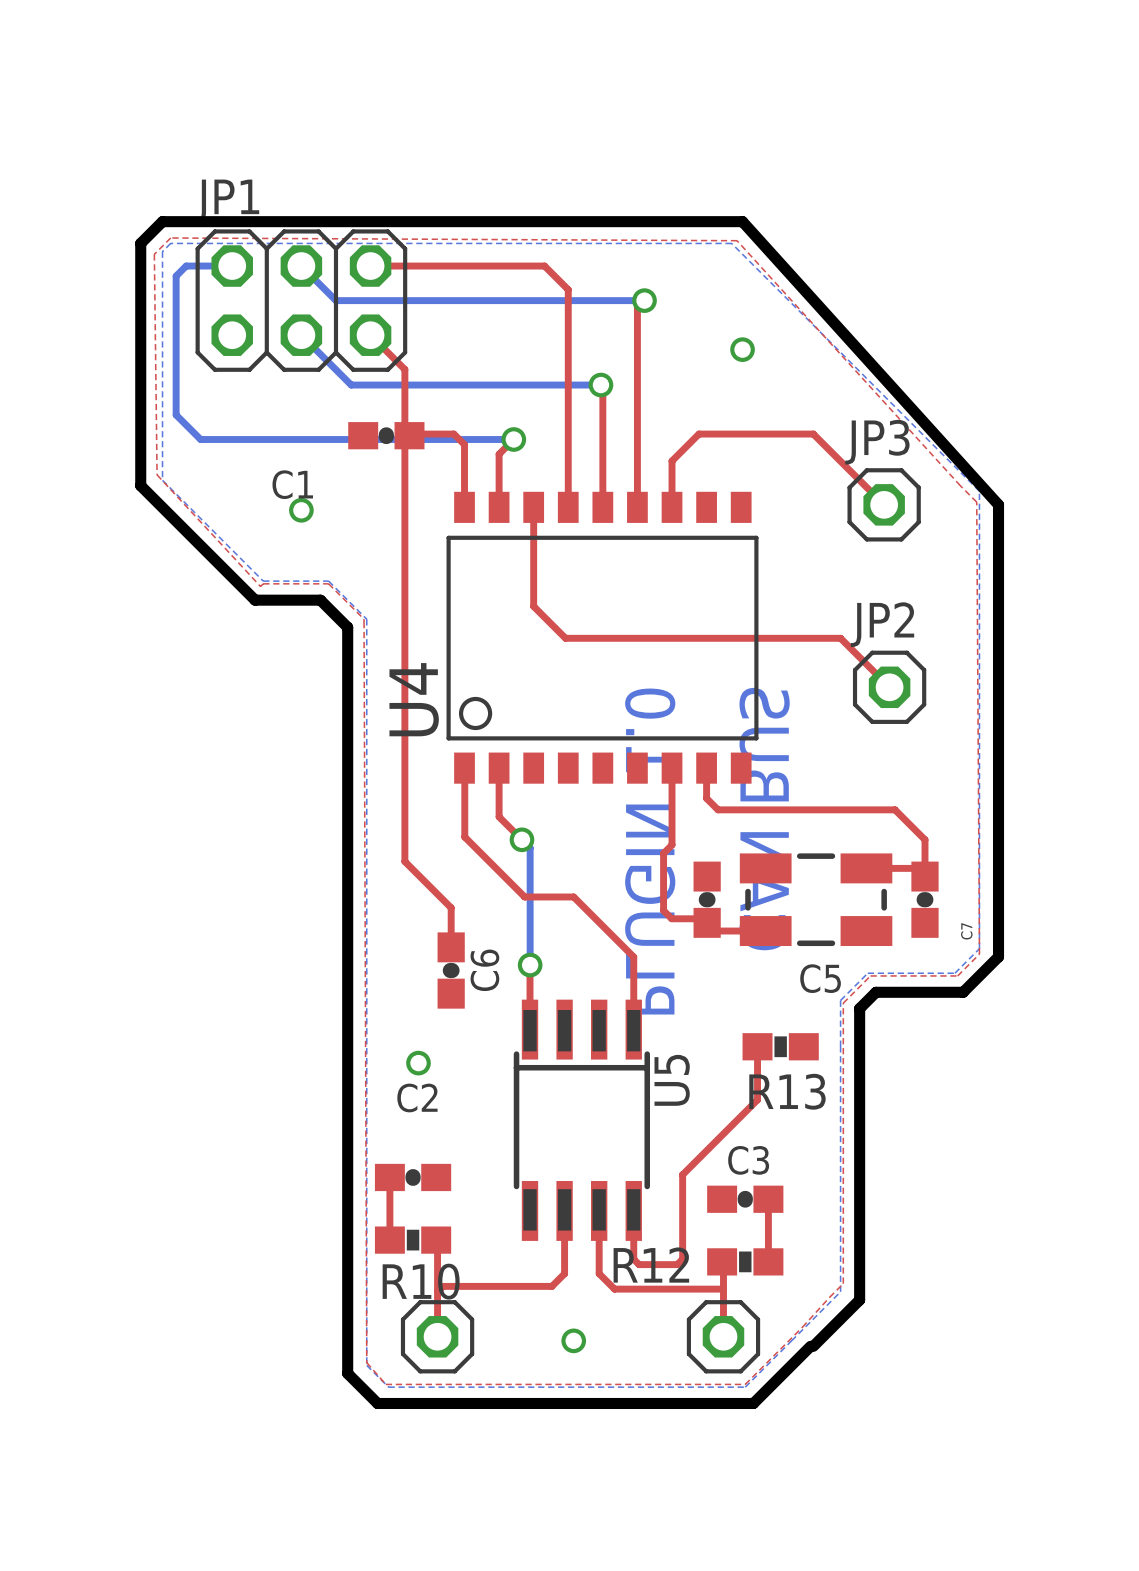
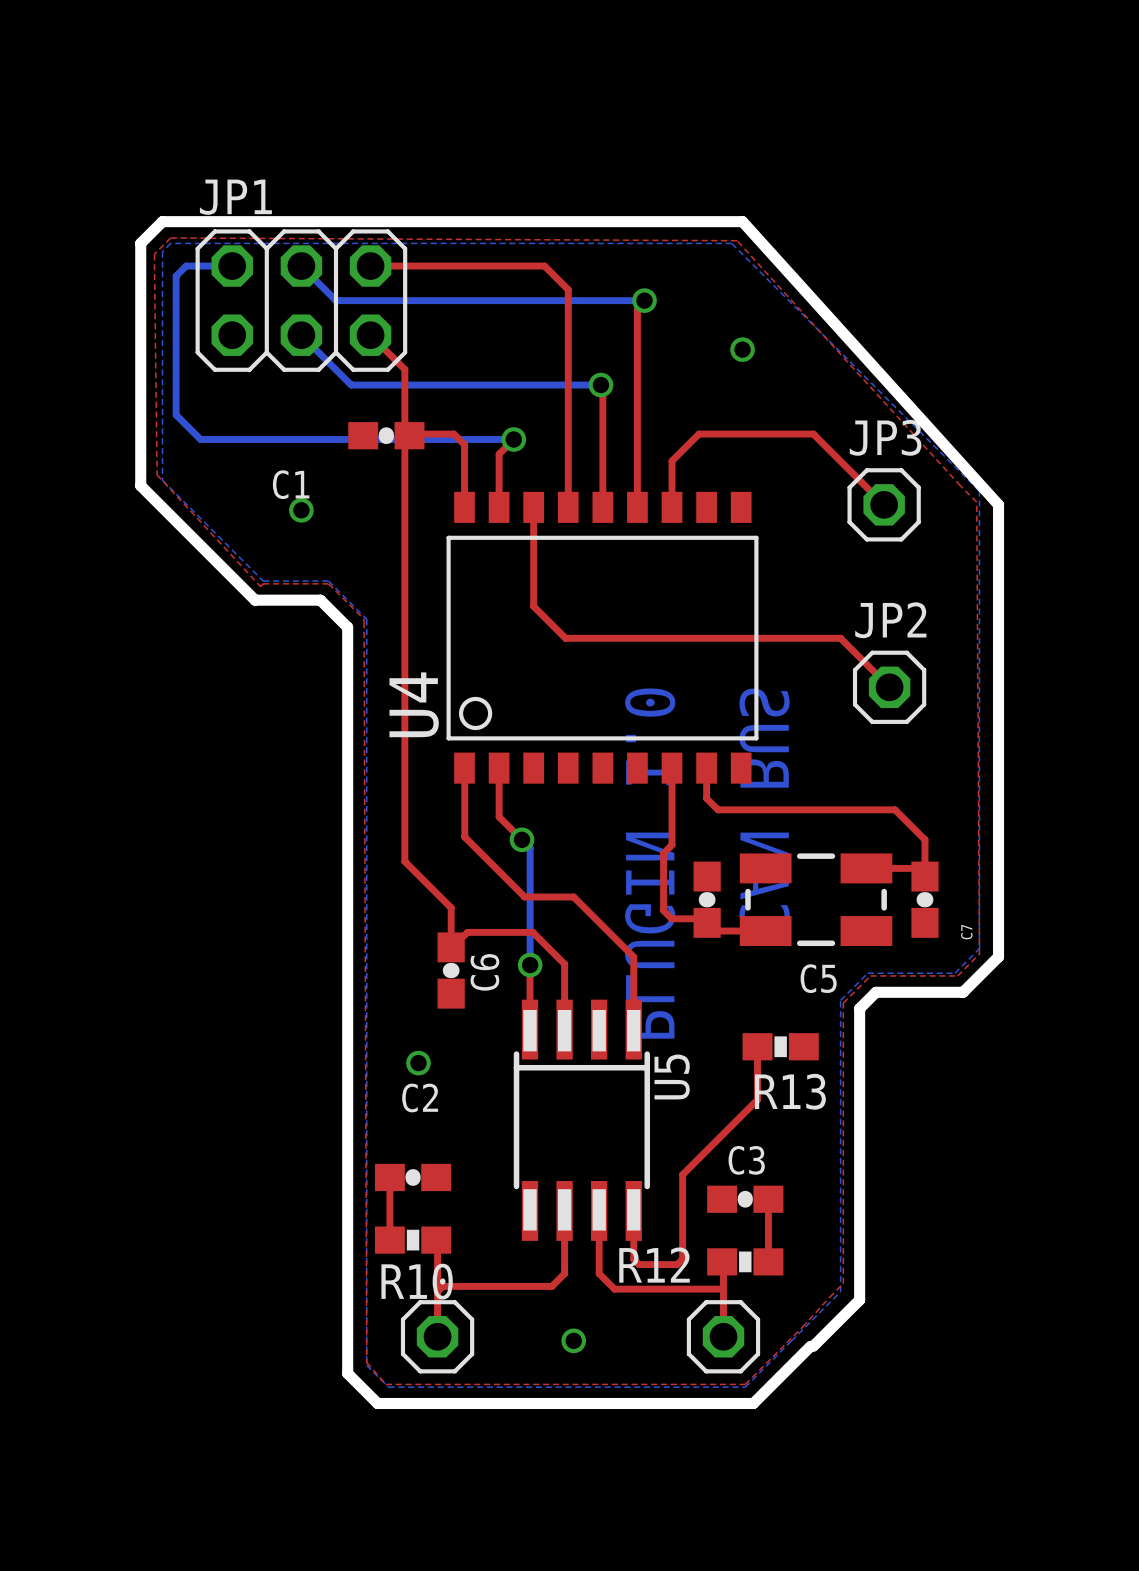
top track: none -> (451, 947) (467, 932) (532, 932) (564, 964) (564, 1029)

